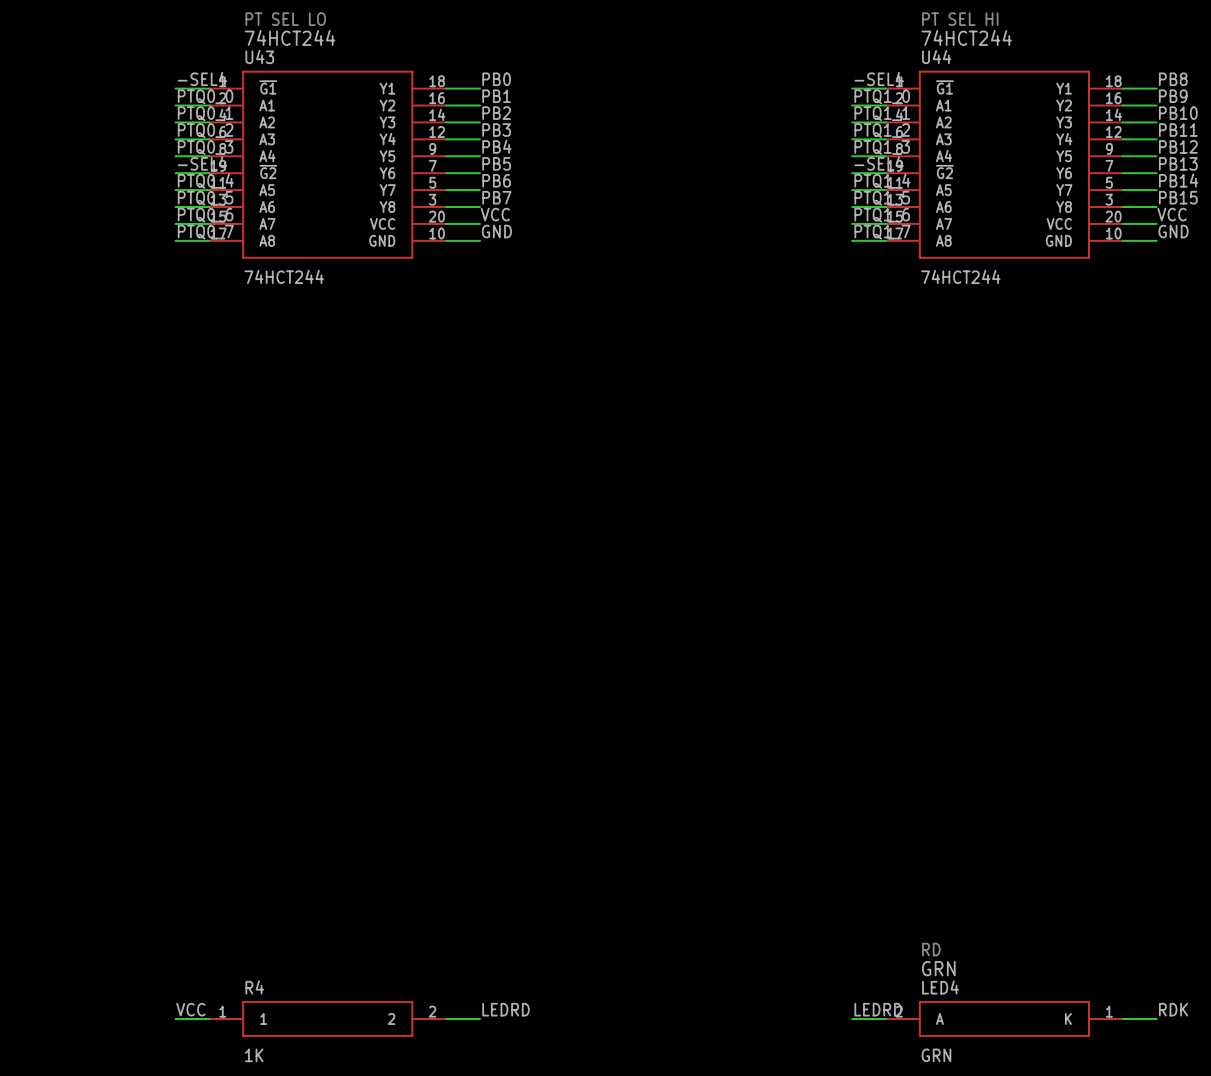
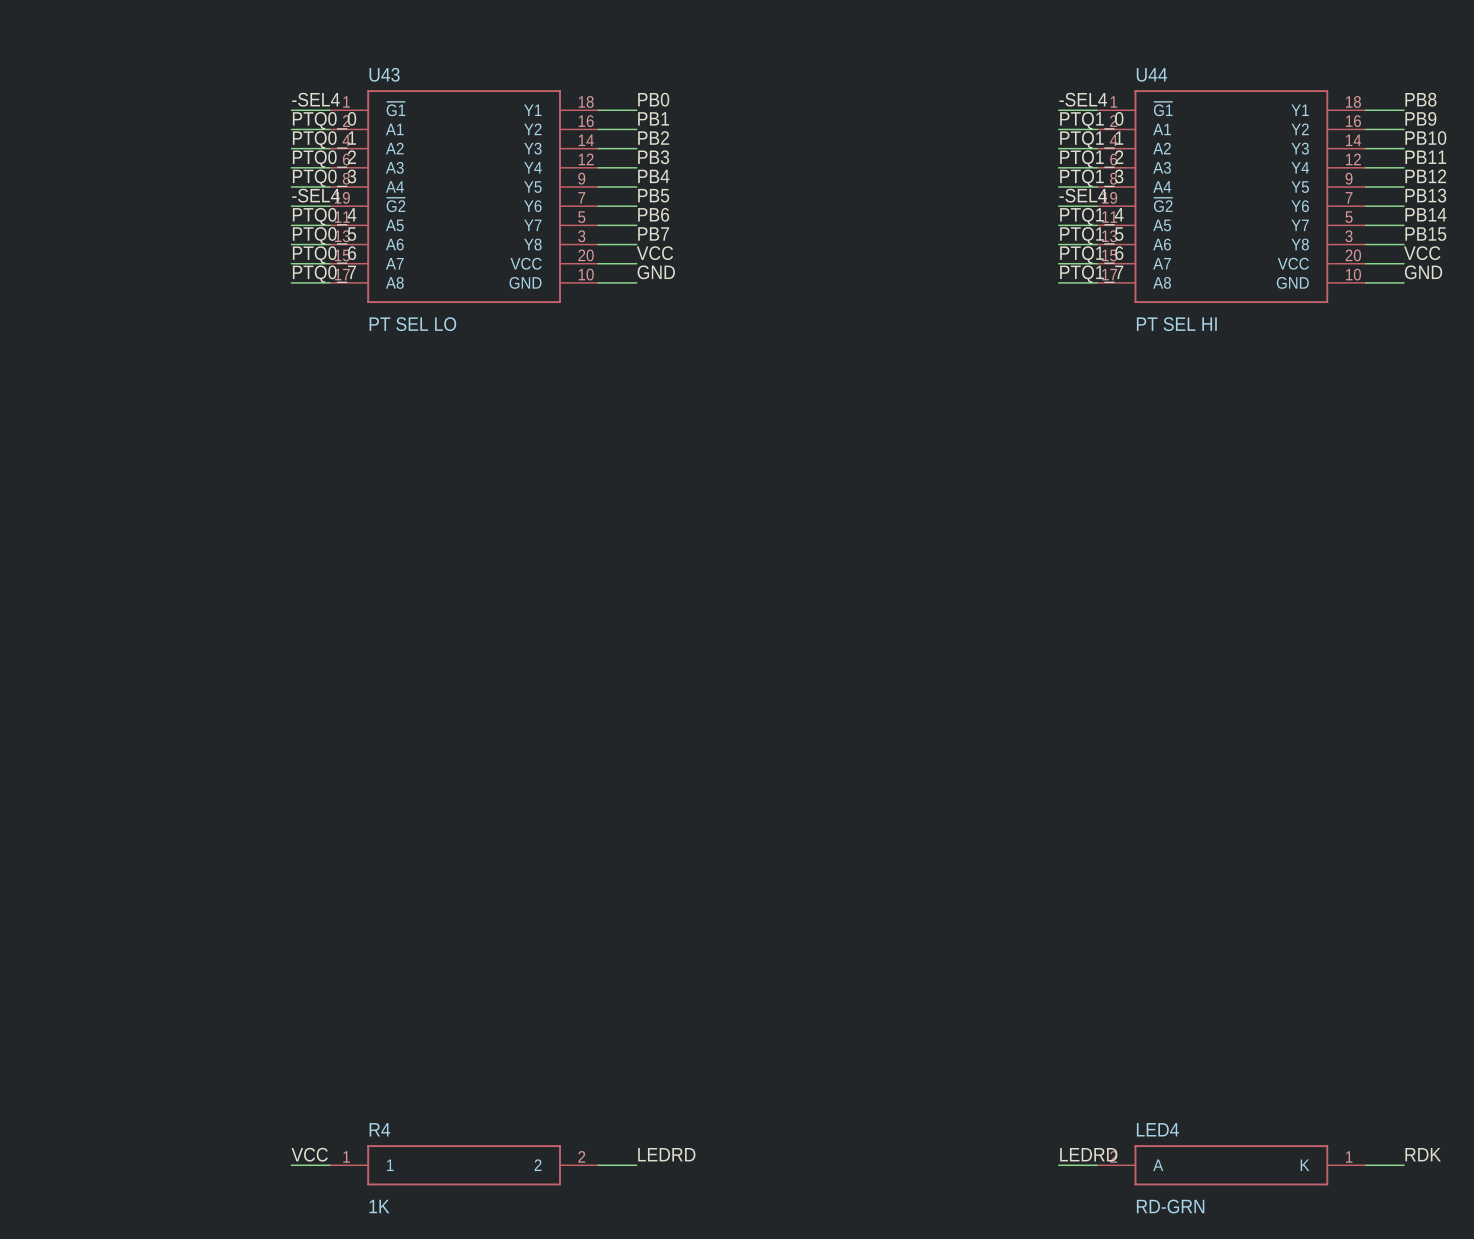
text: PT SEL LO (285, 19) -> none
text: PT SEL HI (960, 19) -> none
text: 74HCT244 (290, 37) -> none
text: 74HCT244 (966, 37) -> none
U43 value: 74HCT244 (284, 276) -> PT SEL LO (412, 324)
U44 value: 74HCT244 (960, 276) -> PT SEL HI (1176, 324)
text: RD (931, 949) -> none
text: GRN (938, 968) -> none
LED4 value: GRN (936, 1055) -> RD-GRN (1170, 1206)

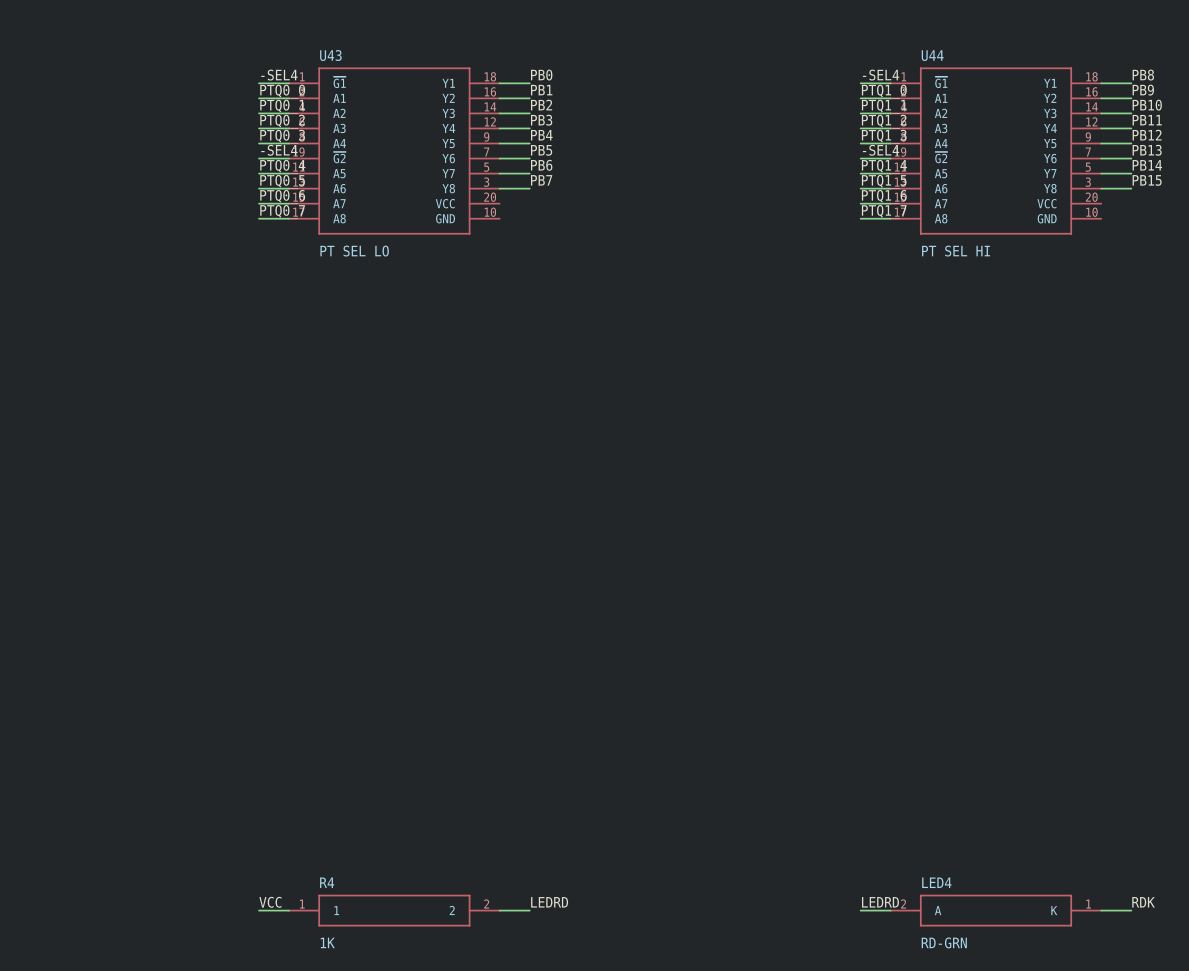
label: VCC (654, 253) -> none
label: VCC (1422, 253) -> none
wire: (598, 263) (636, 263) -> none
wire: (1365, 263) (1403, 263) -> none
label: GND (656, 272) -> none
label: GND (1423, 272) -> none
wire: (598, 282) (636, 282) -> none
wire: (1365, 282) (1403, 282) -> none

